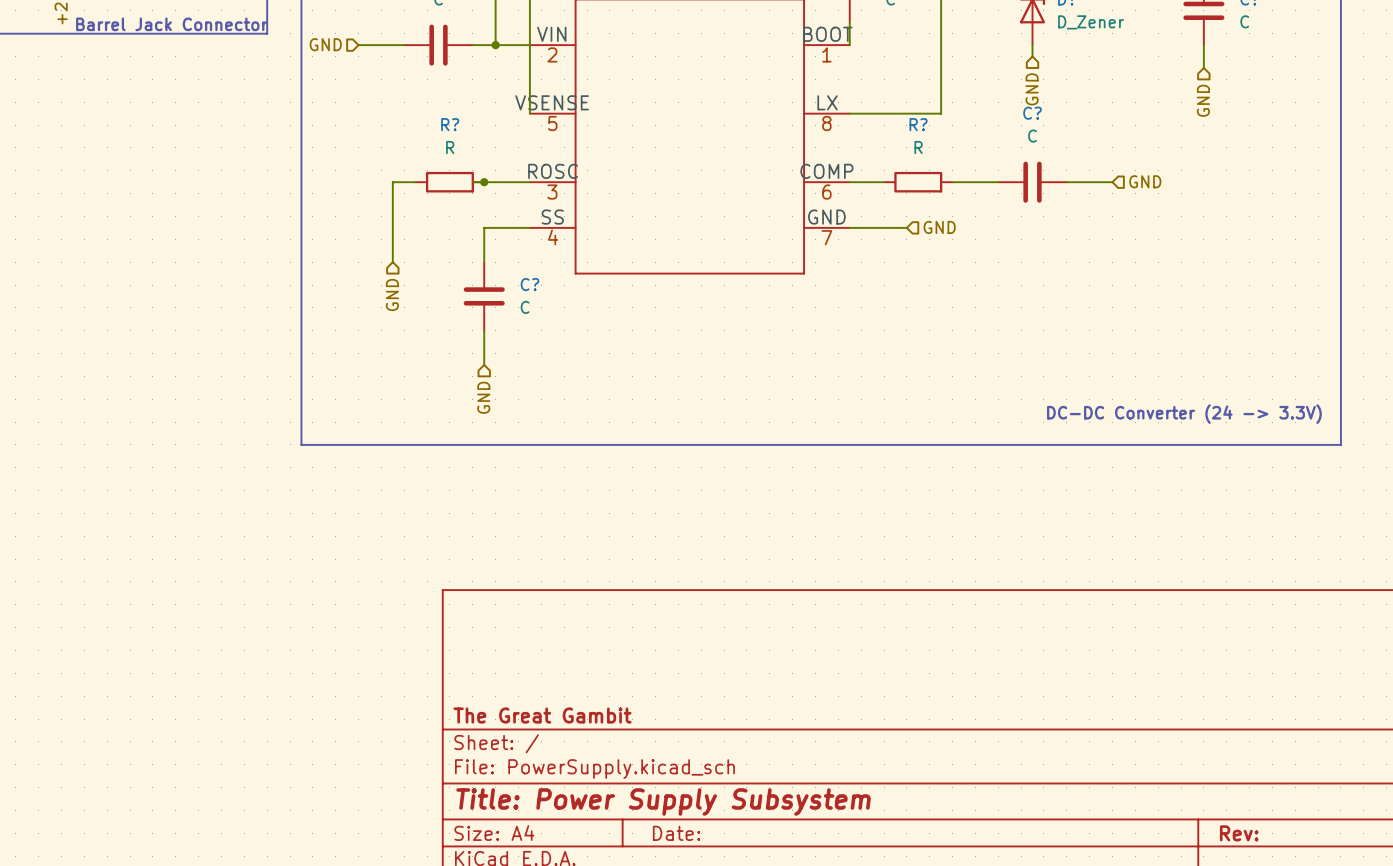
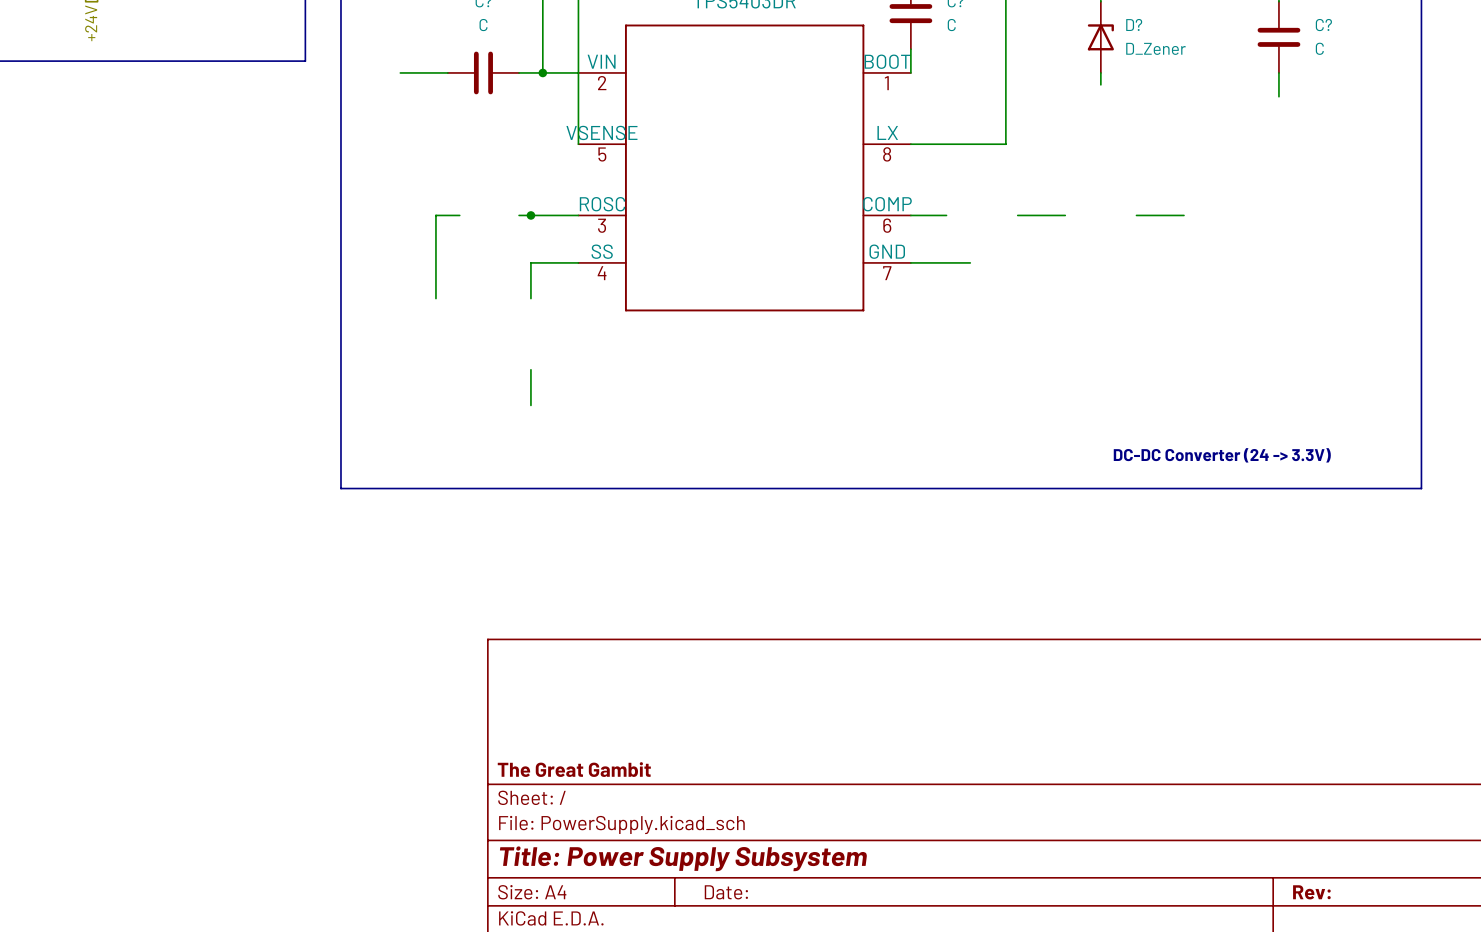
text: Barrel Jack Connector (171, 24) -> none
hierarchical label: GND (325, 44) -> none
hierarchical label: GND (1032, 89) -> none
hierarchical label: GND (1203, 100) -> none
hierarchical label: GND (1145, 181) -> none
R?: R (449, 182) -> none
R?: R (918, 182) -> none
C?: C (1032, 182) -> none
hierarchical label: GND (939, 227) -> none
hierarchical label: GND (392, 294) -> none
C?: C (484, 296) -> none
hierarchical label: GND (483, 397) -> none

